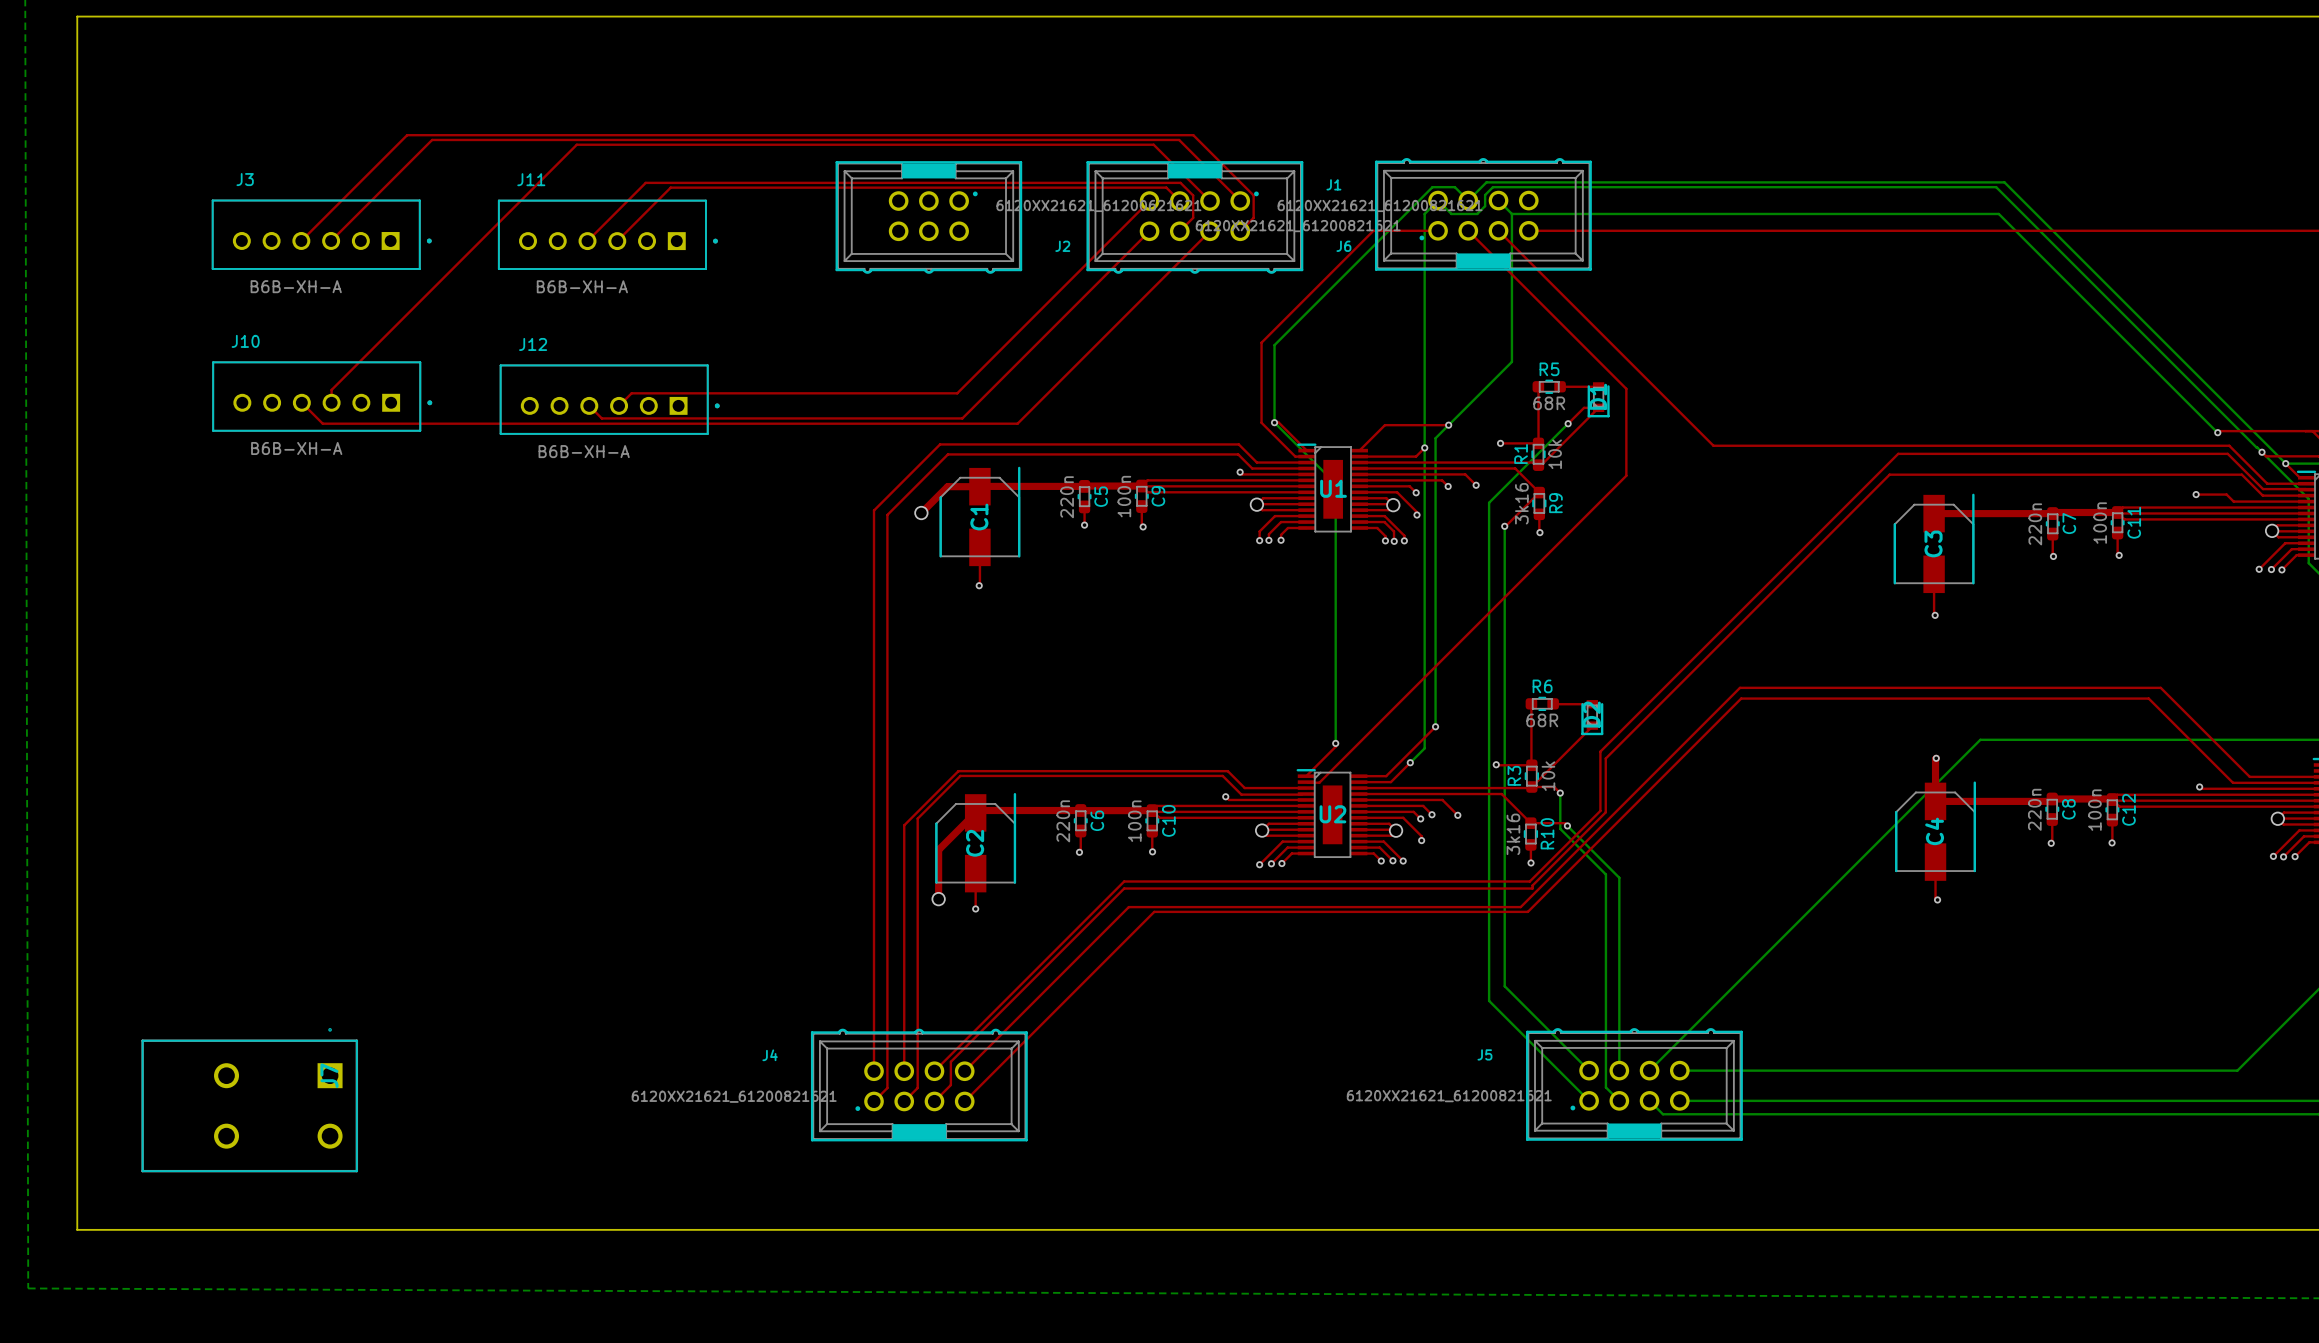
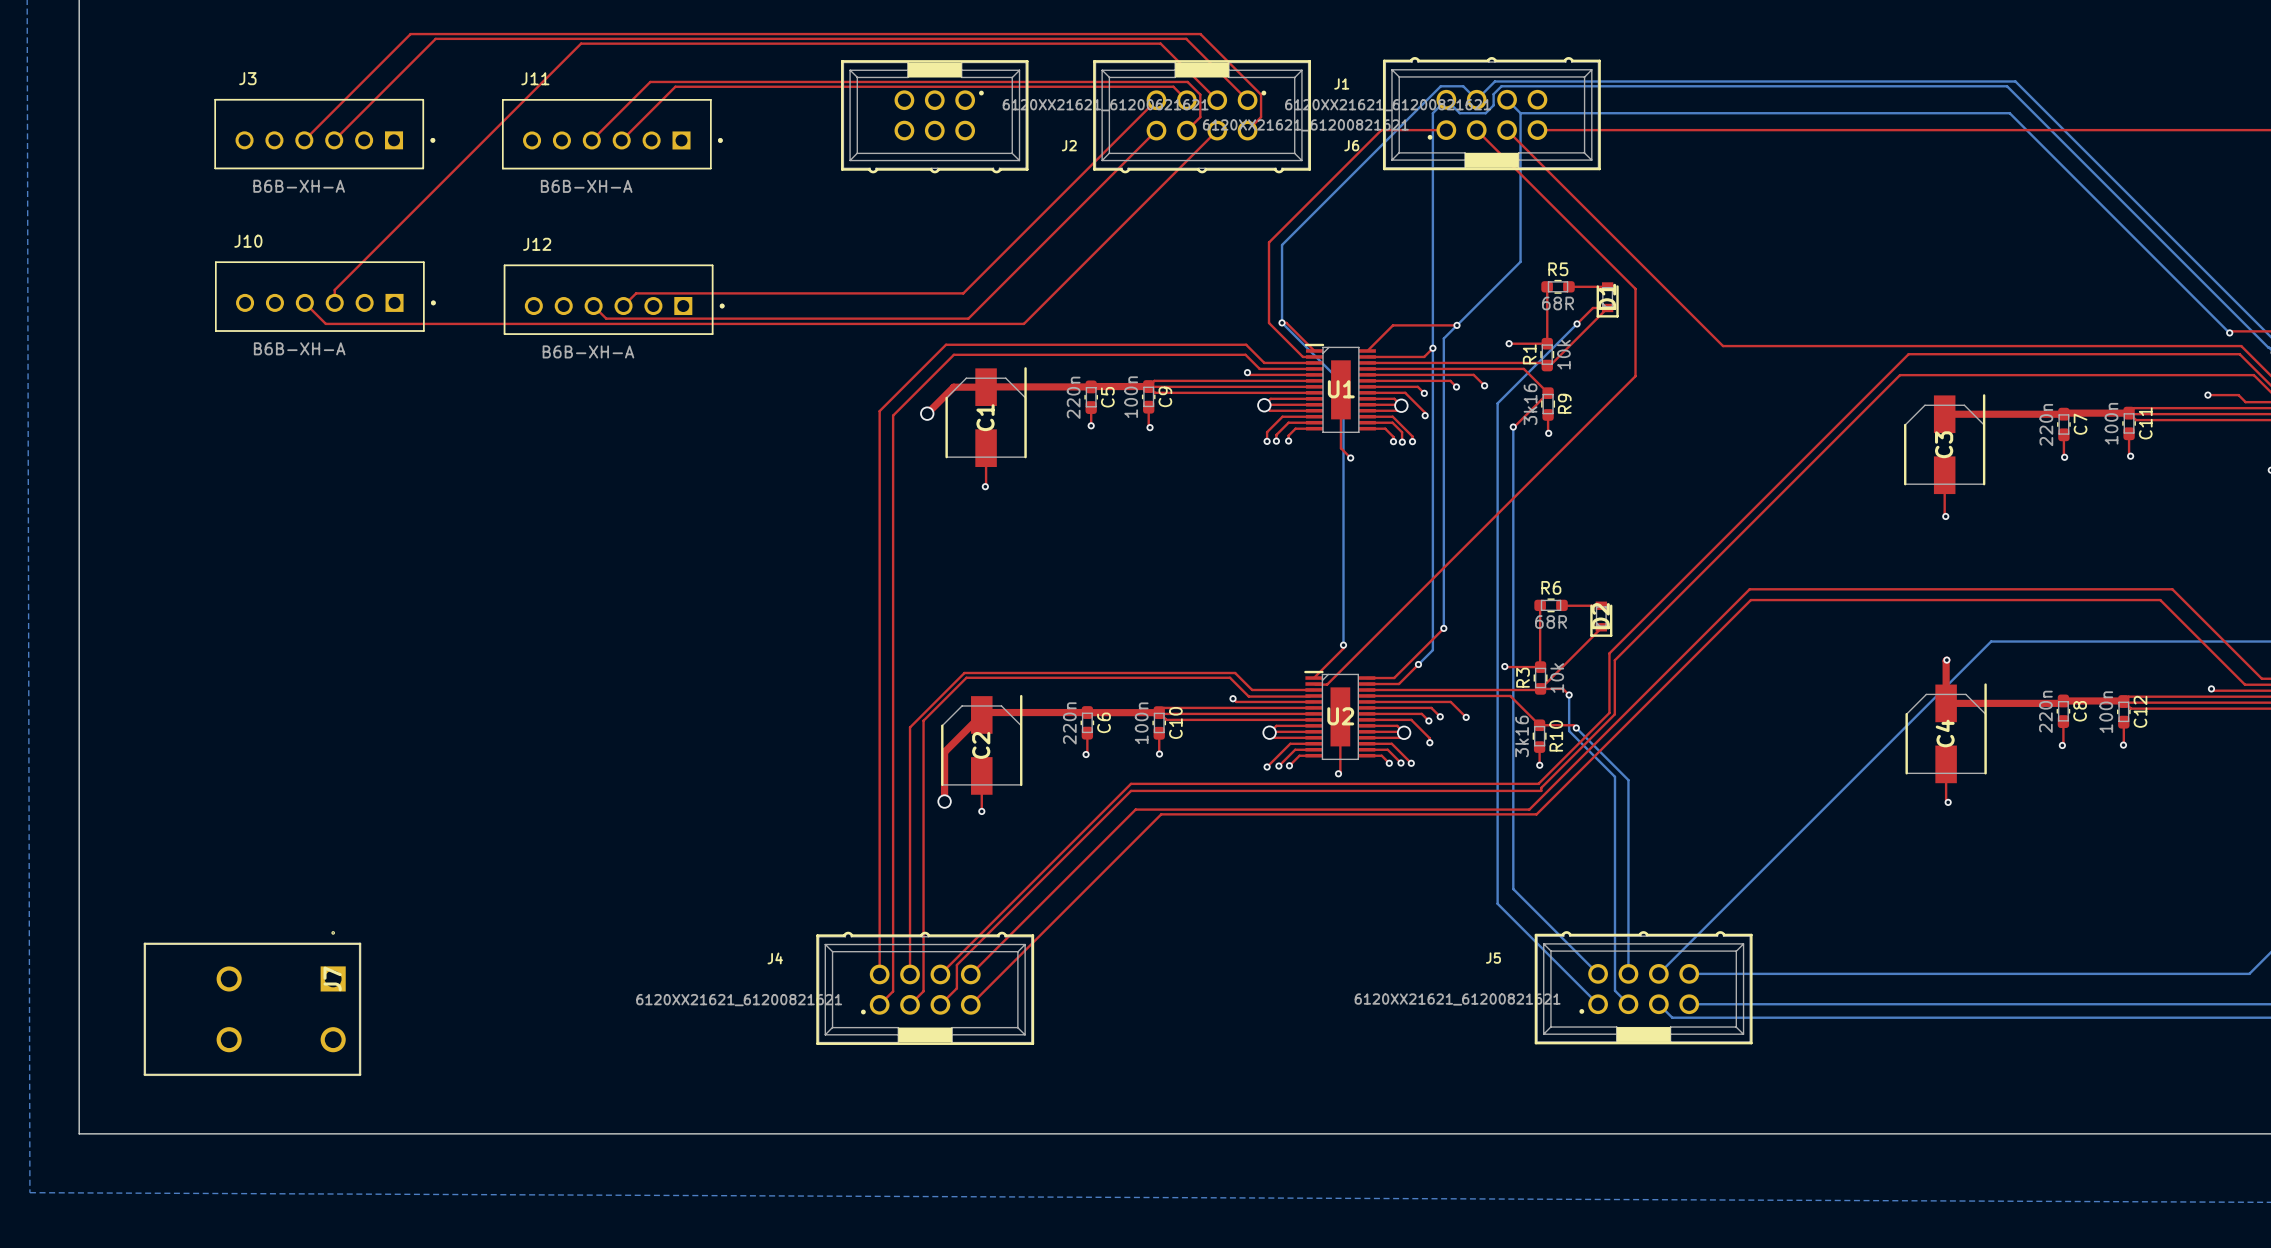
top track: none -> (1340, 389) (1340, 448) (1350, 458)
via: none -> (1350, 458)
top track: none -> (1340, 716) (1340, 771) (1338, 773)
via: none -> (1338, 773)

